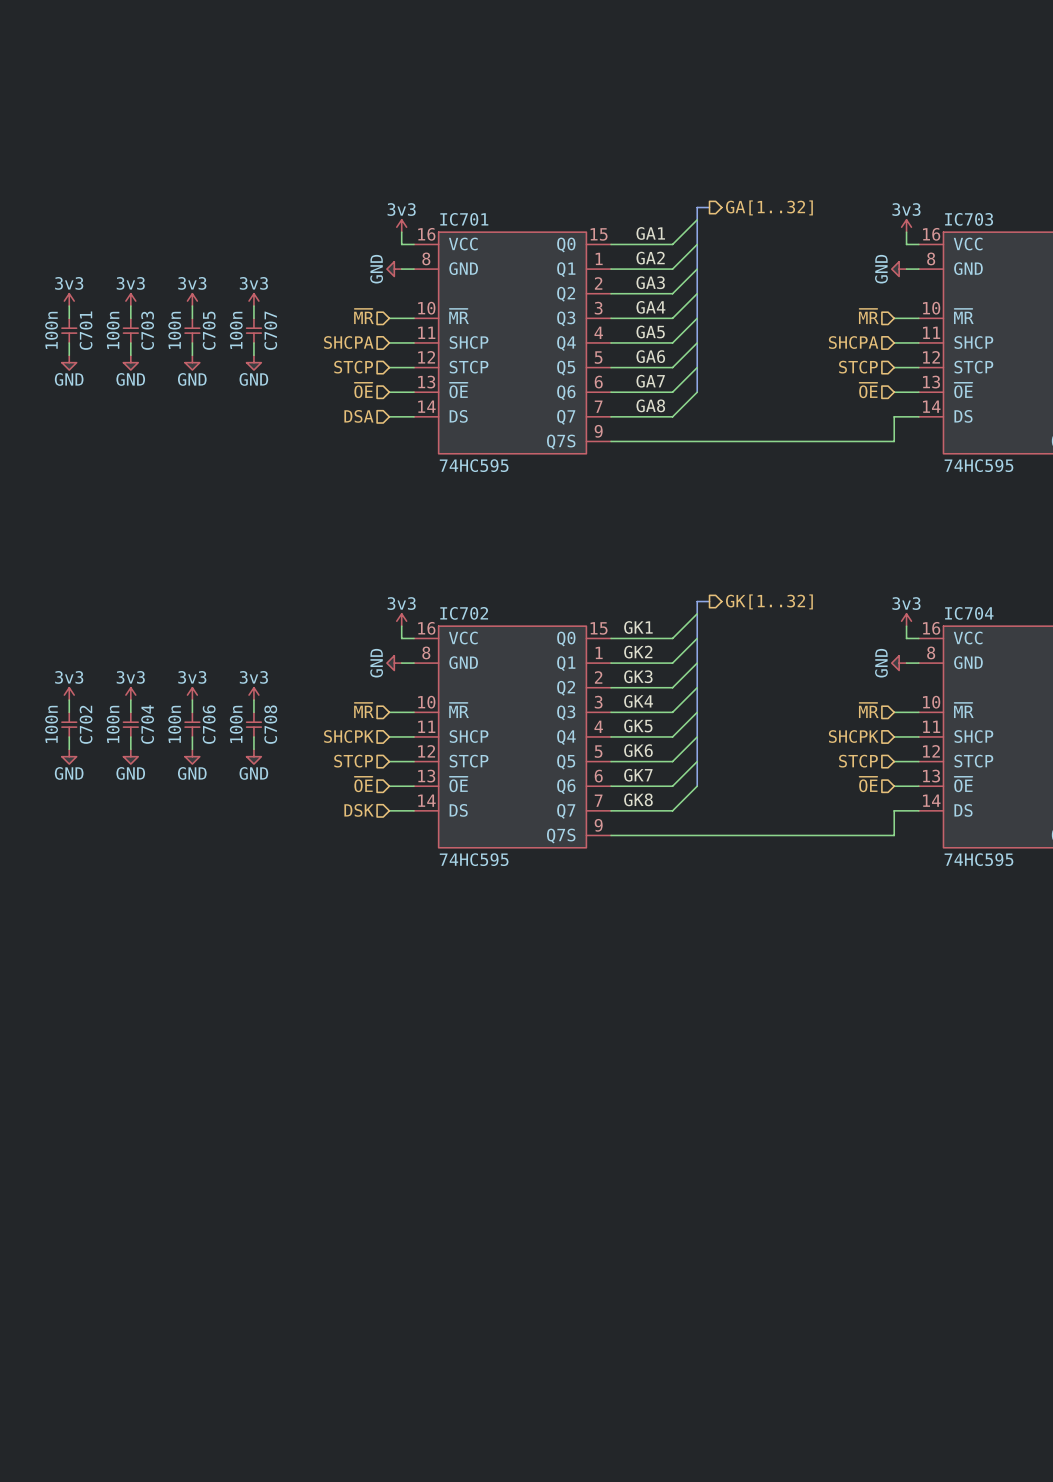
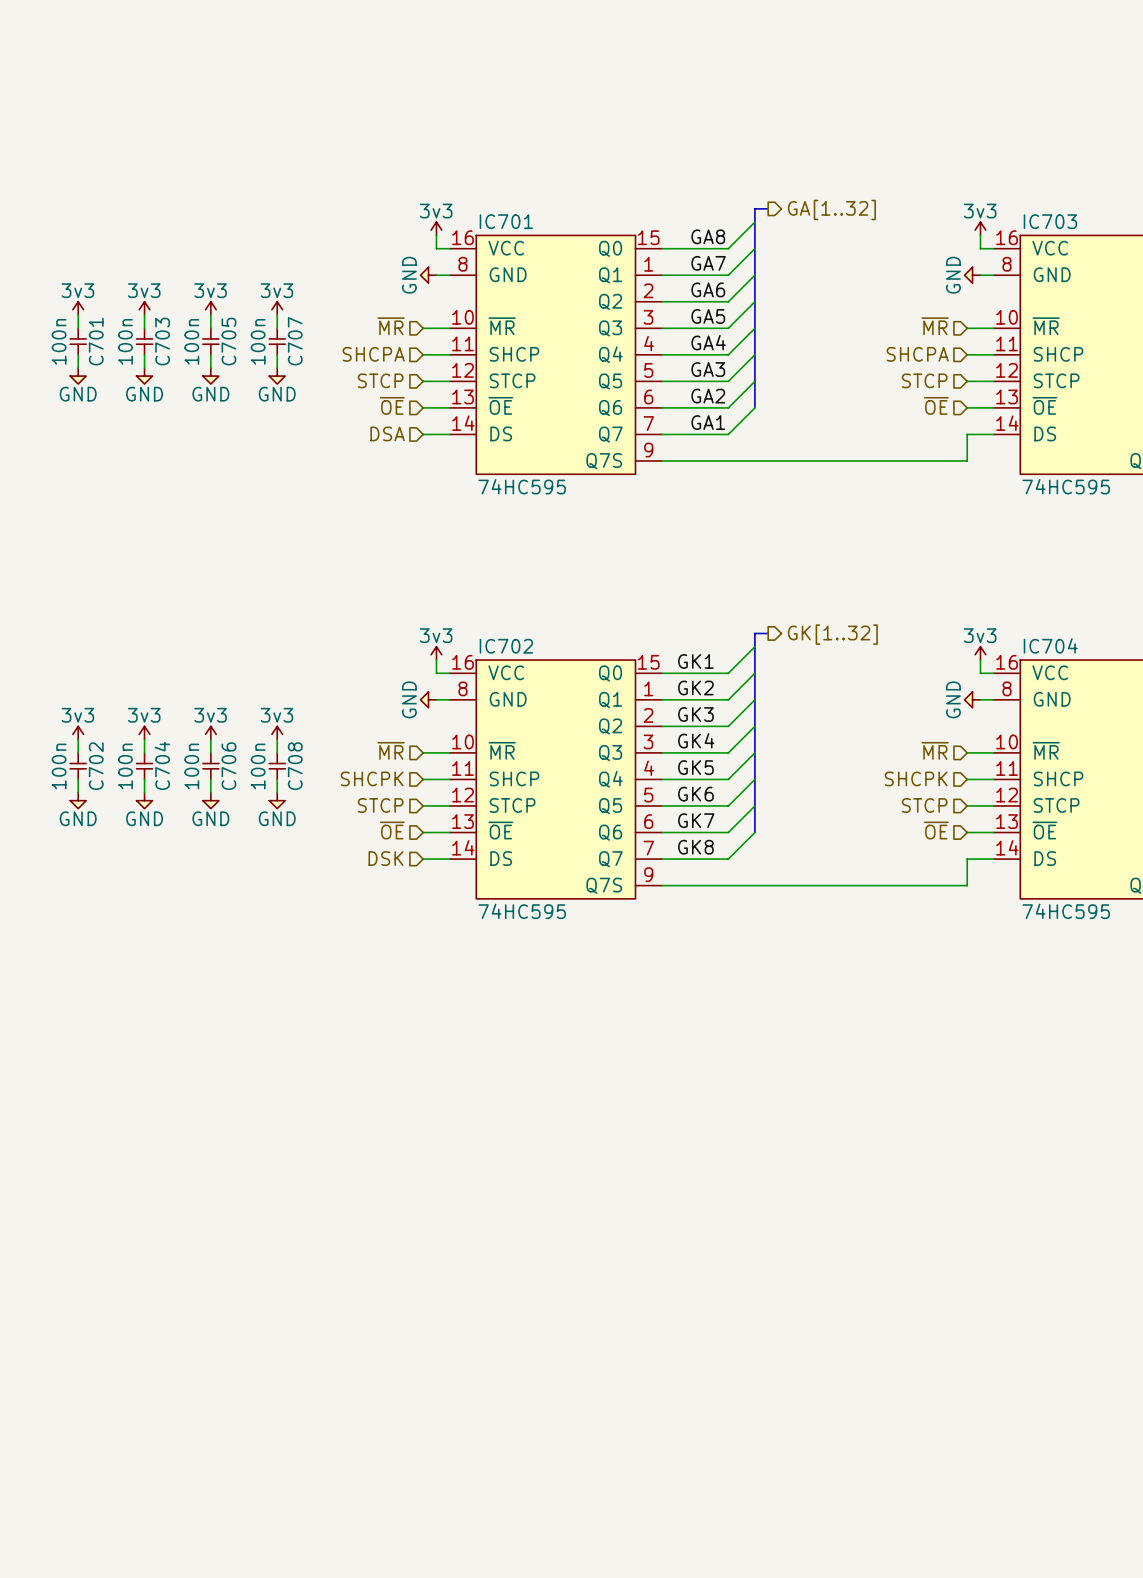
label: GA1 (650, 233) -> GA8 (708, 236)
label: GA2 (650, 258) -> GA7 (708, 263)
label: GA3 (650, 282) -> GA6 (708, 289)
label: GA4 (650, 307) -> GA5 (708, 316)
label: GA5 (650, 331) -> GA4 (708, 342)
label: GA6 (650, 356) -> GA3 (708, 369)
label: GA7 (650, 381) -> GA2 (708, 396)
label: GA8 (650, 405) -> GA1 (708, 422)

